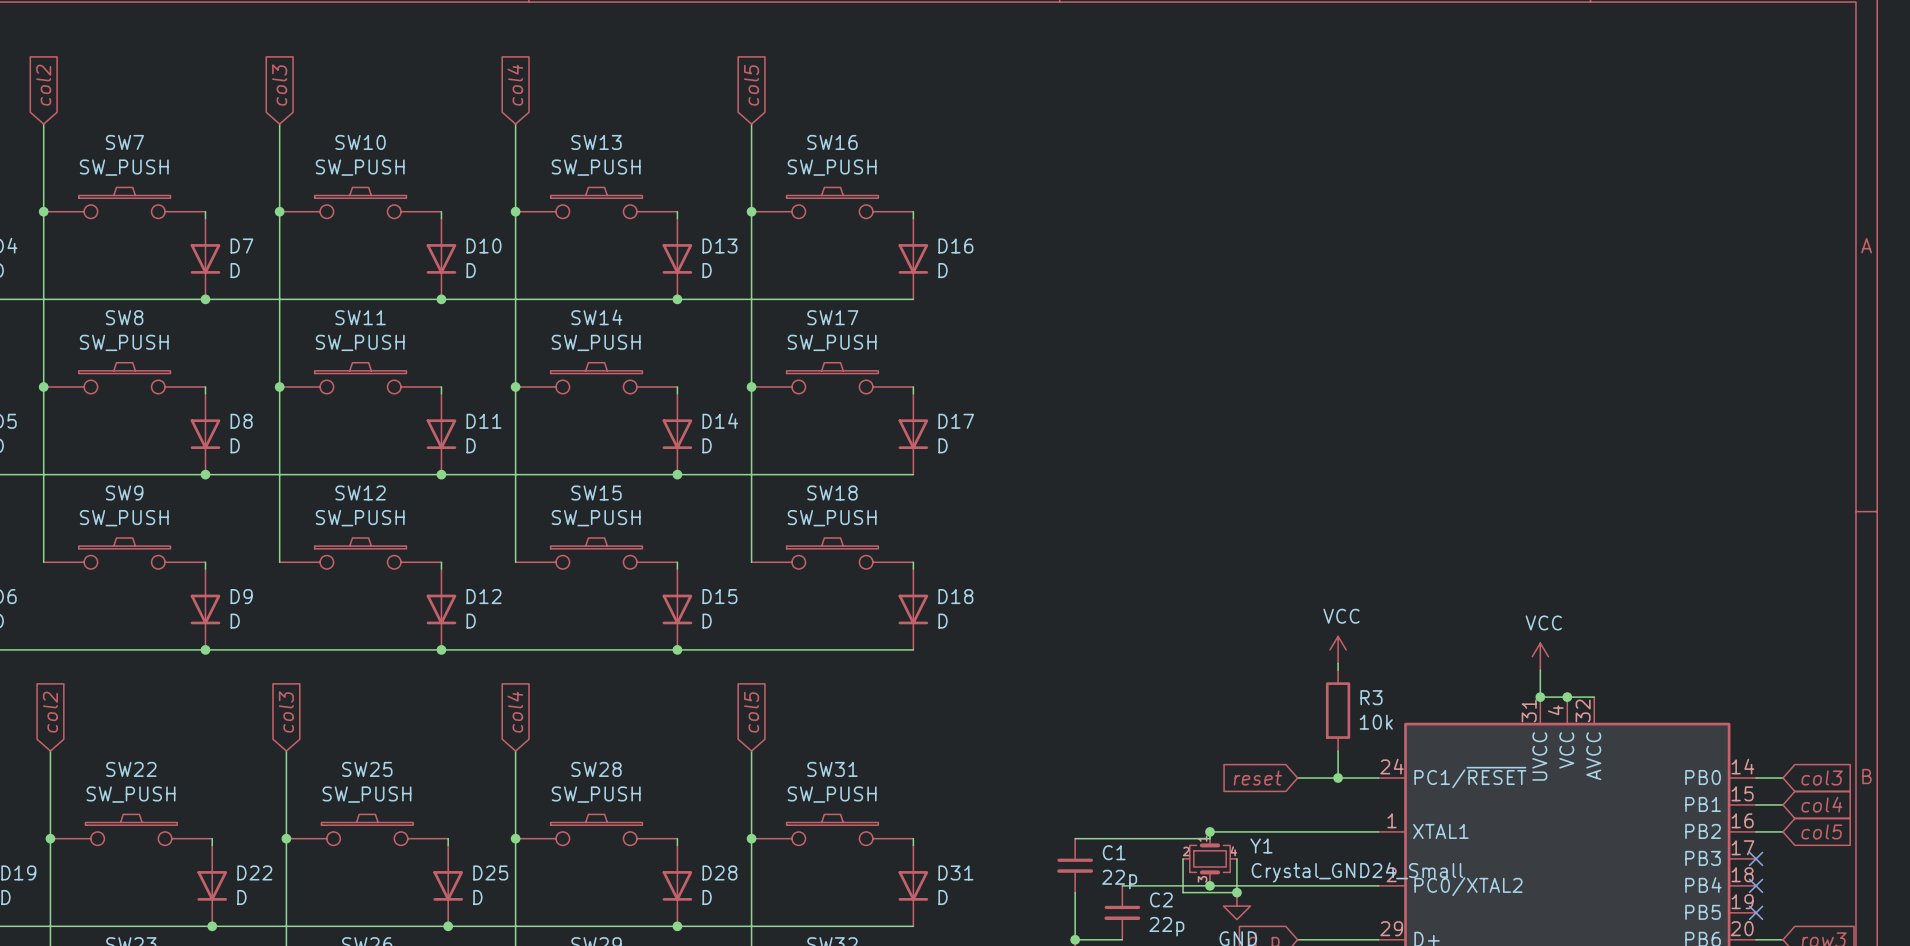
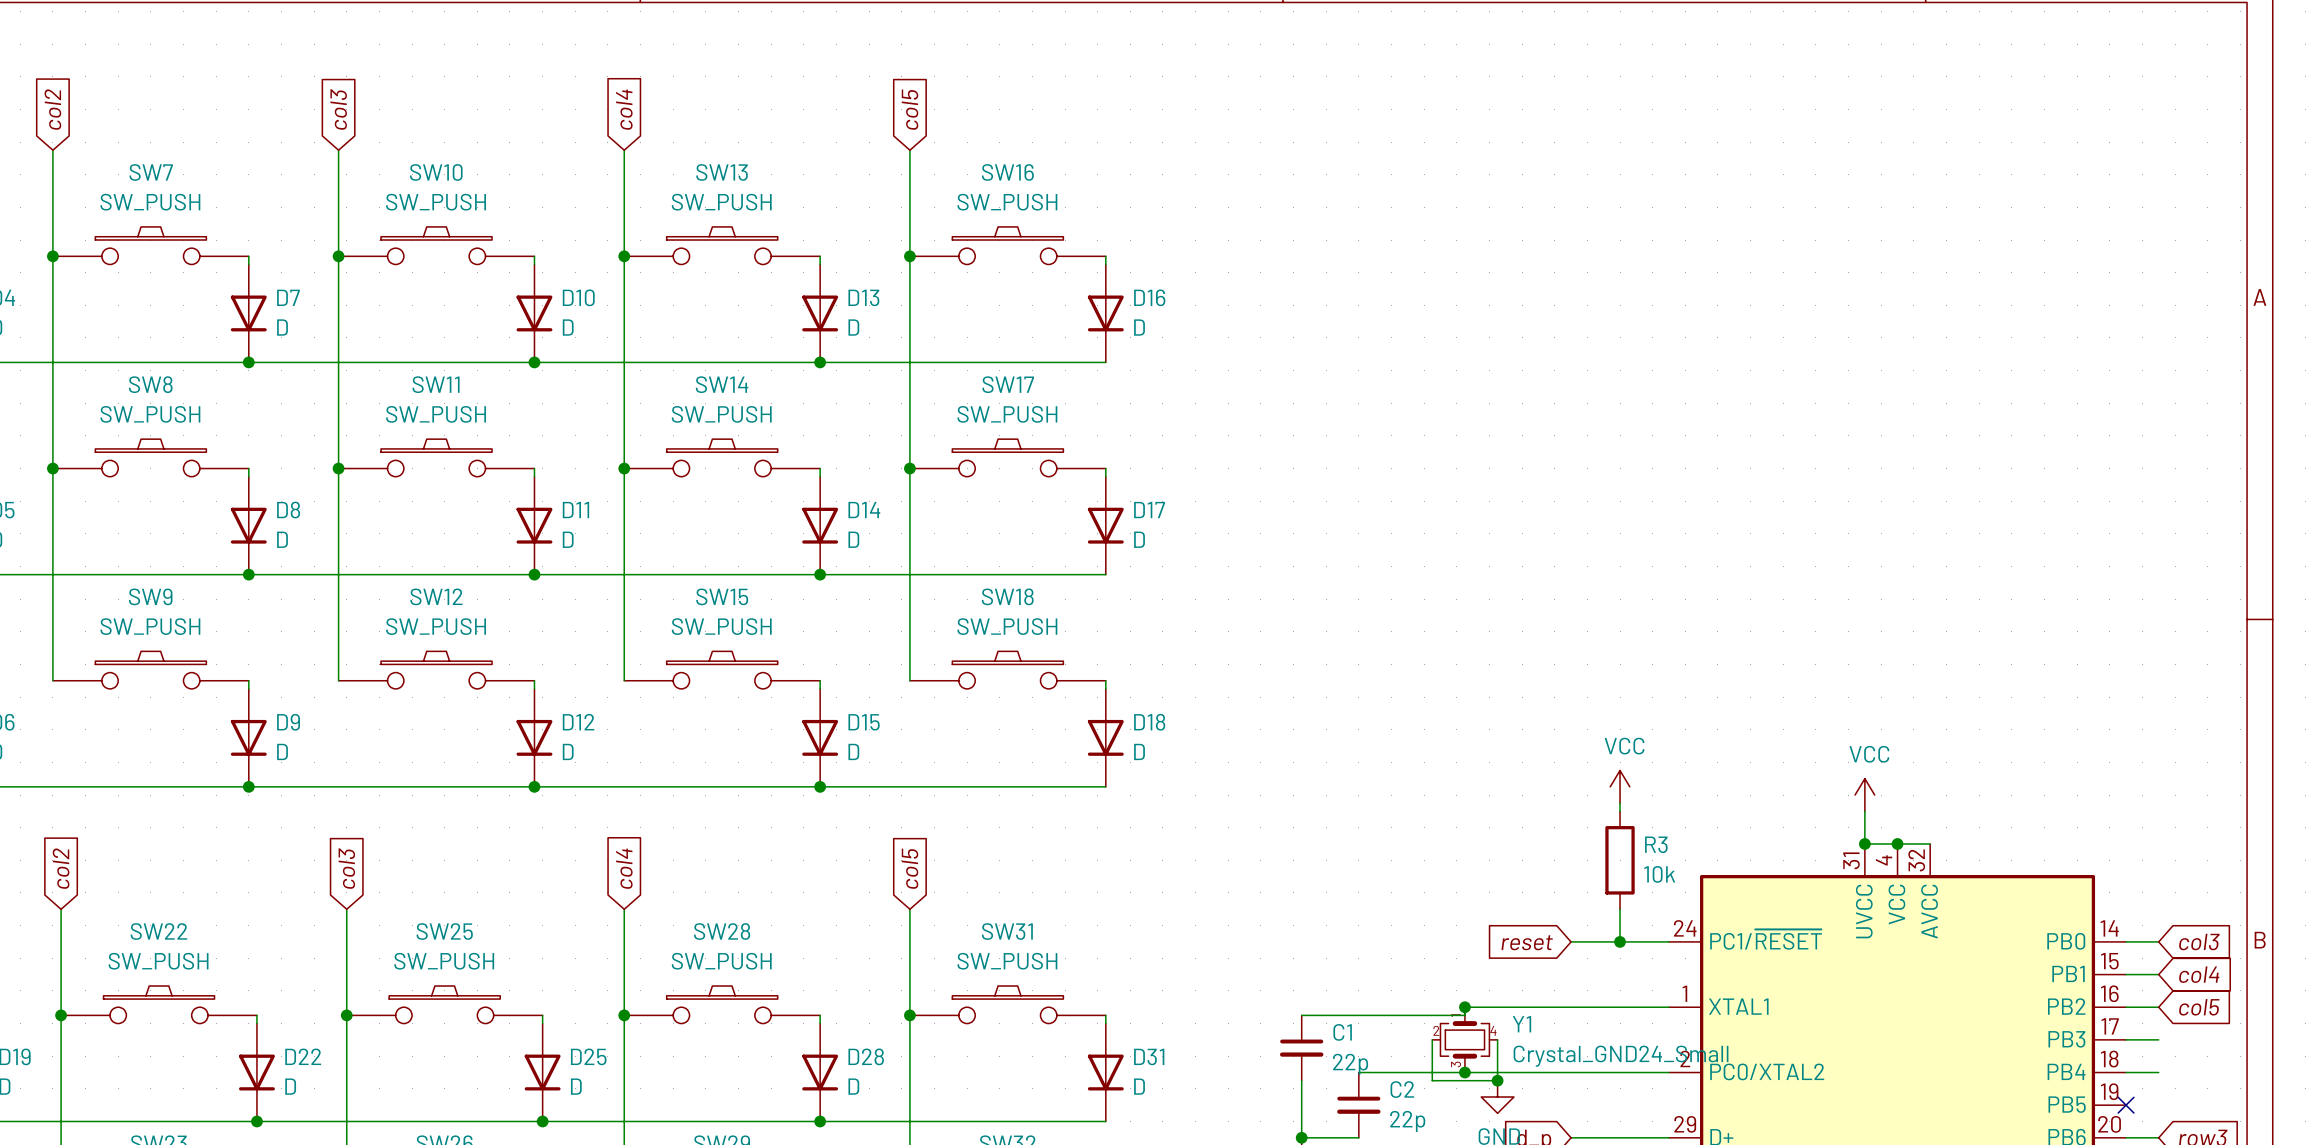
wire: none -> (2126, 1039) (2158, 1039)
no-connect mark: (1756, 858) -> none
wire: none -> (2126, 1072) (2158, 1072)
no-connect mark: (1756, 885) -> none

